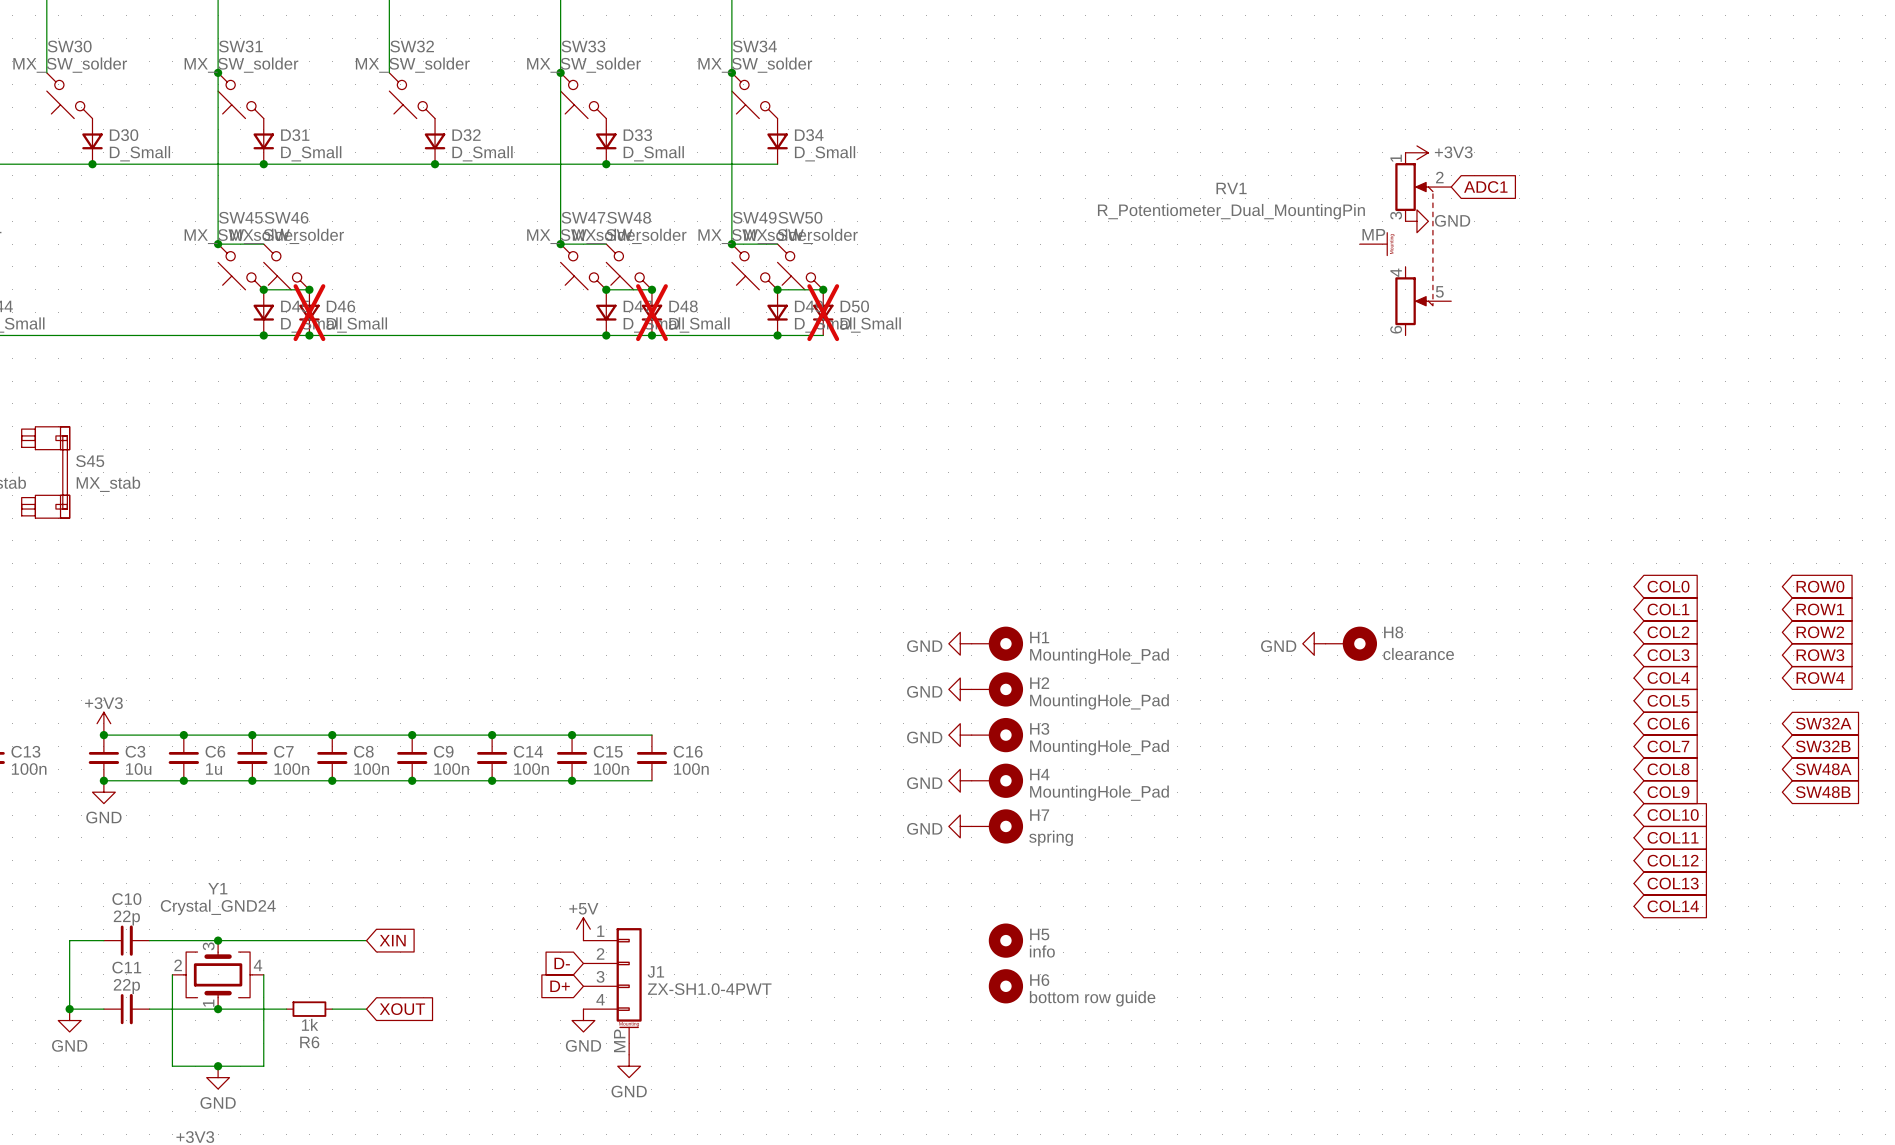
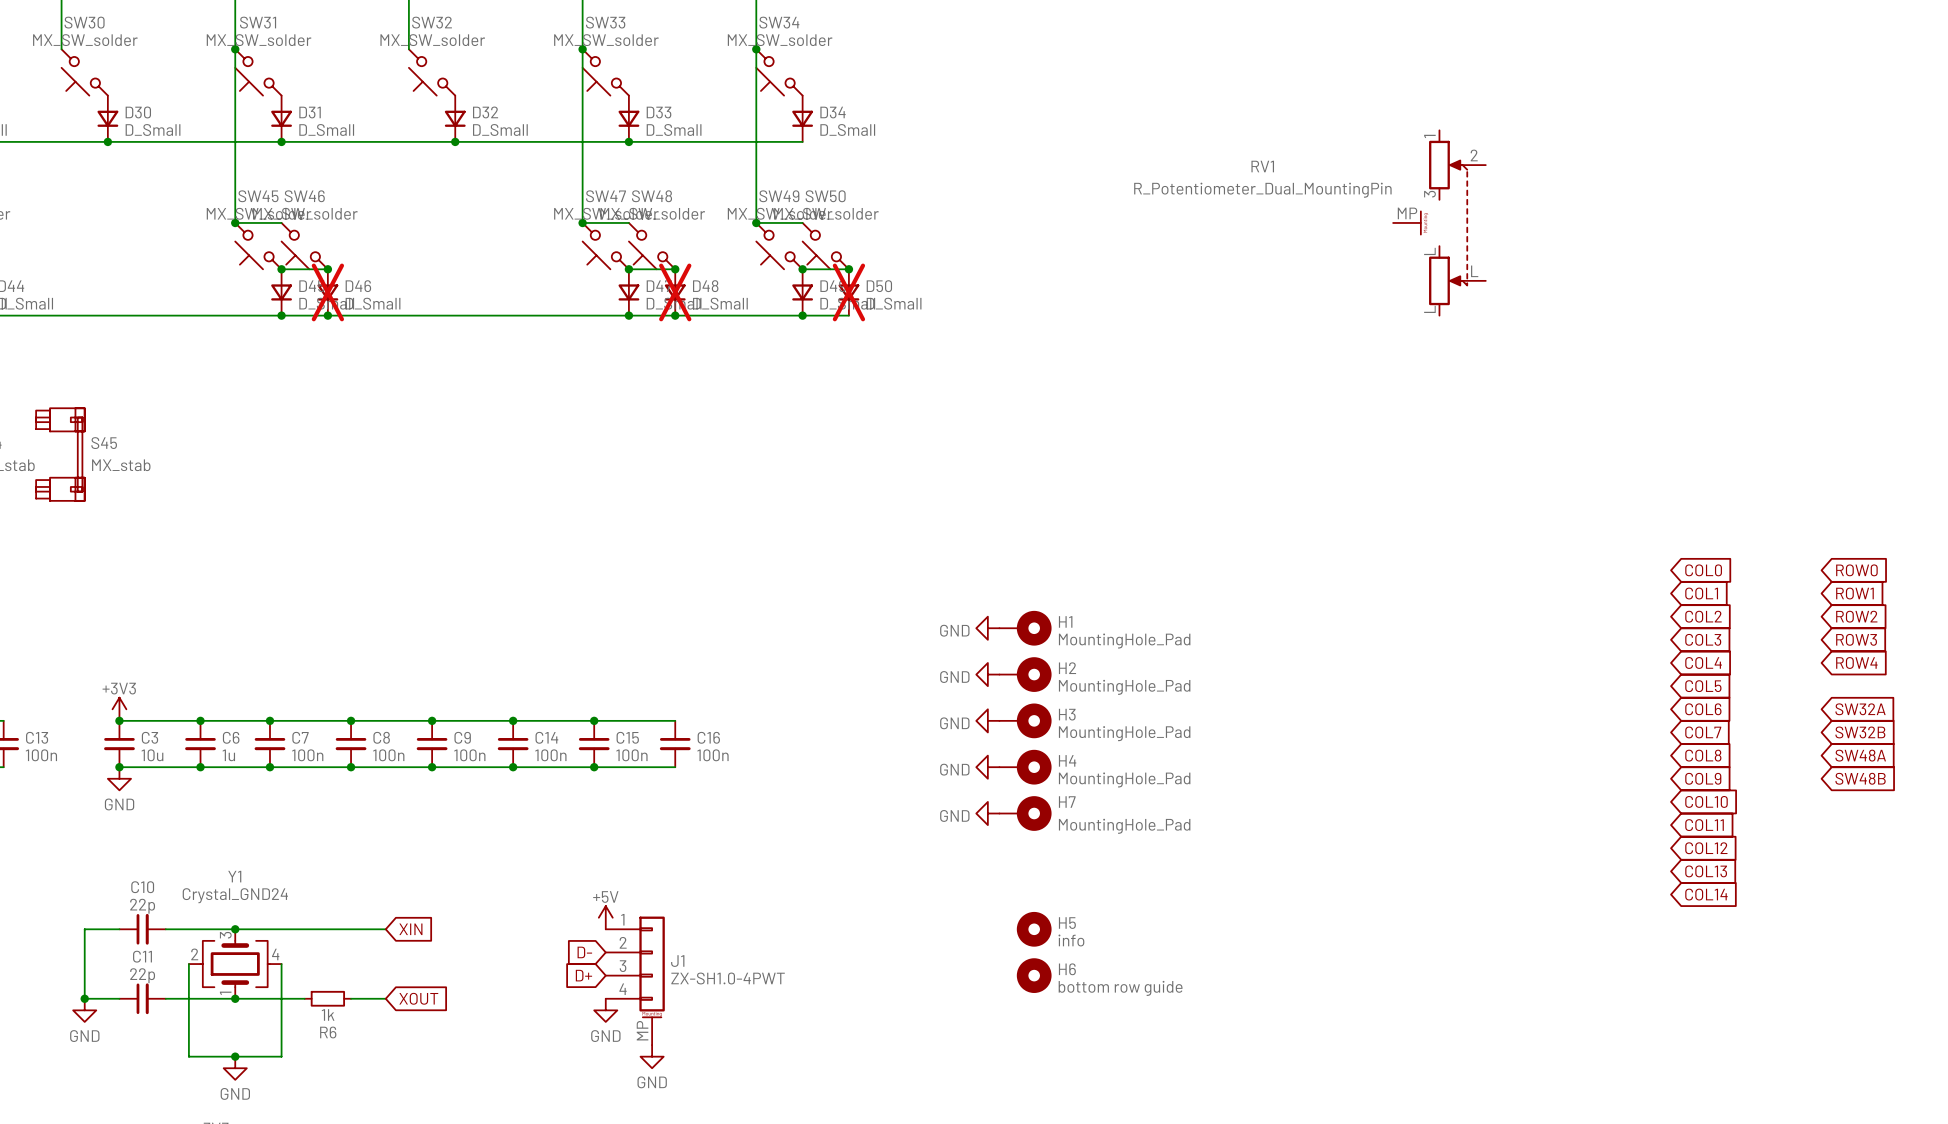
power symbol: +3V3 (1416, 152) -> none
global label: ADC1 (1485, 187) -> none
power symbol: GND (1416, 221) -> none
RV1 pin number: 4 (1396, 272) -> L (1429, 251)
RV1 pin number: 5 (1439, 291) -> L (1474, 271)
RV1 pin number: 6 (1396, 329) -> L (1429, 309)
power symbol: GND (1314, 643) -> none
H8: clearance (1351, 643) -> none
H7 value: spring (1051, 838) -> MountingHole_Pad (1124, 826)

